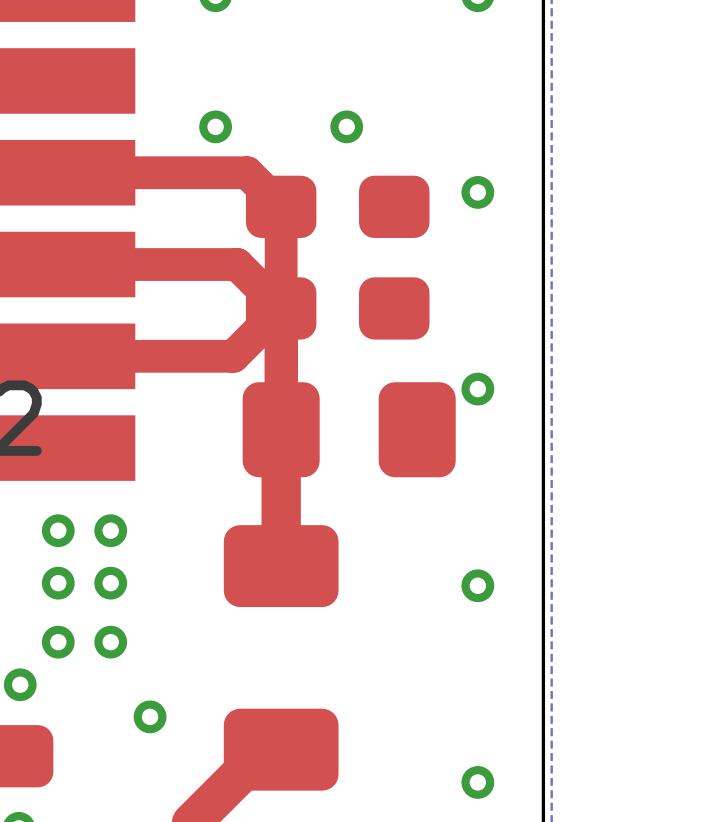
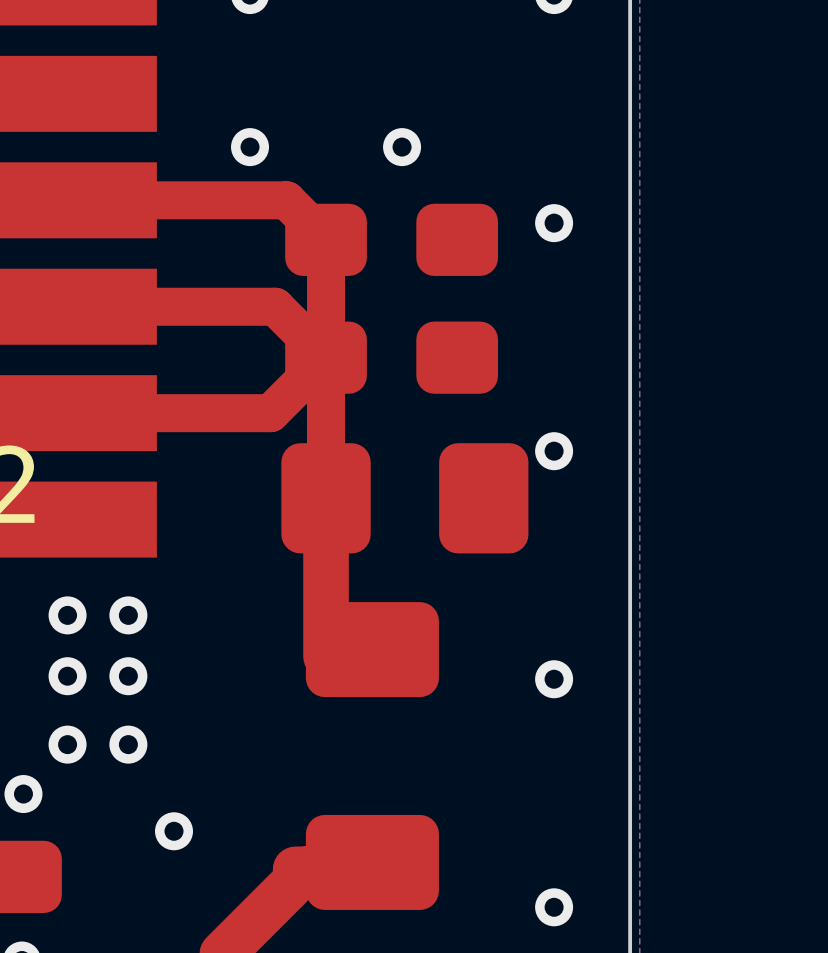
part position: (281, 657) -> (372, 756)

